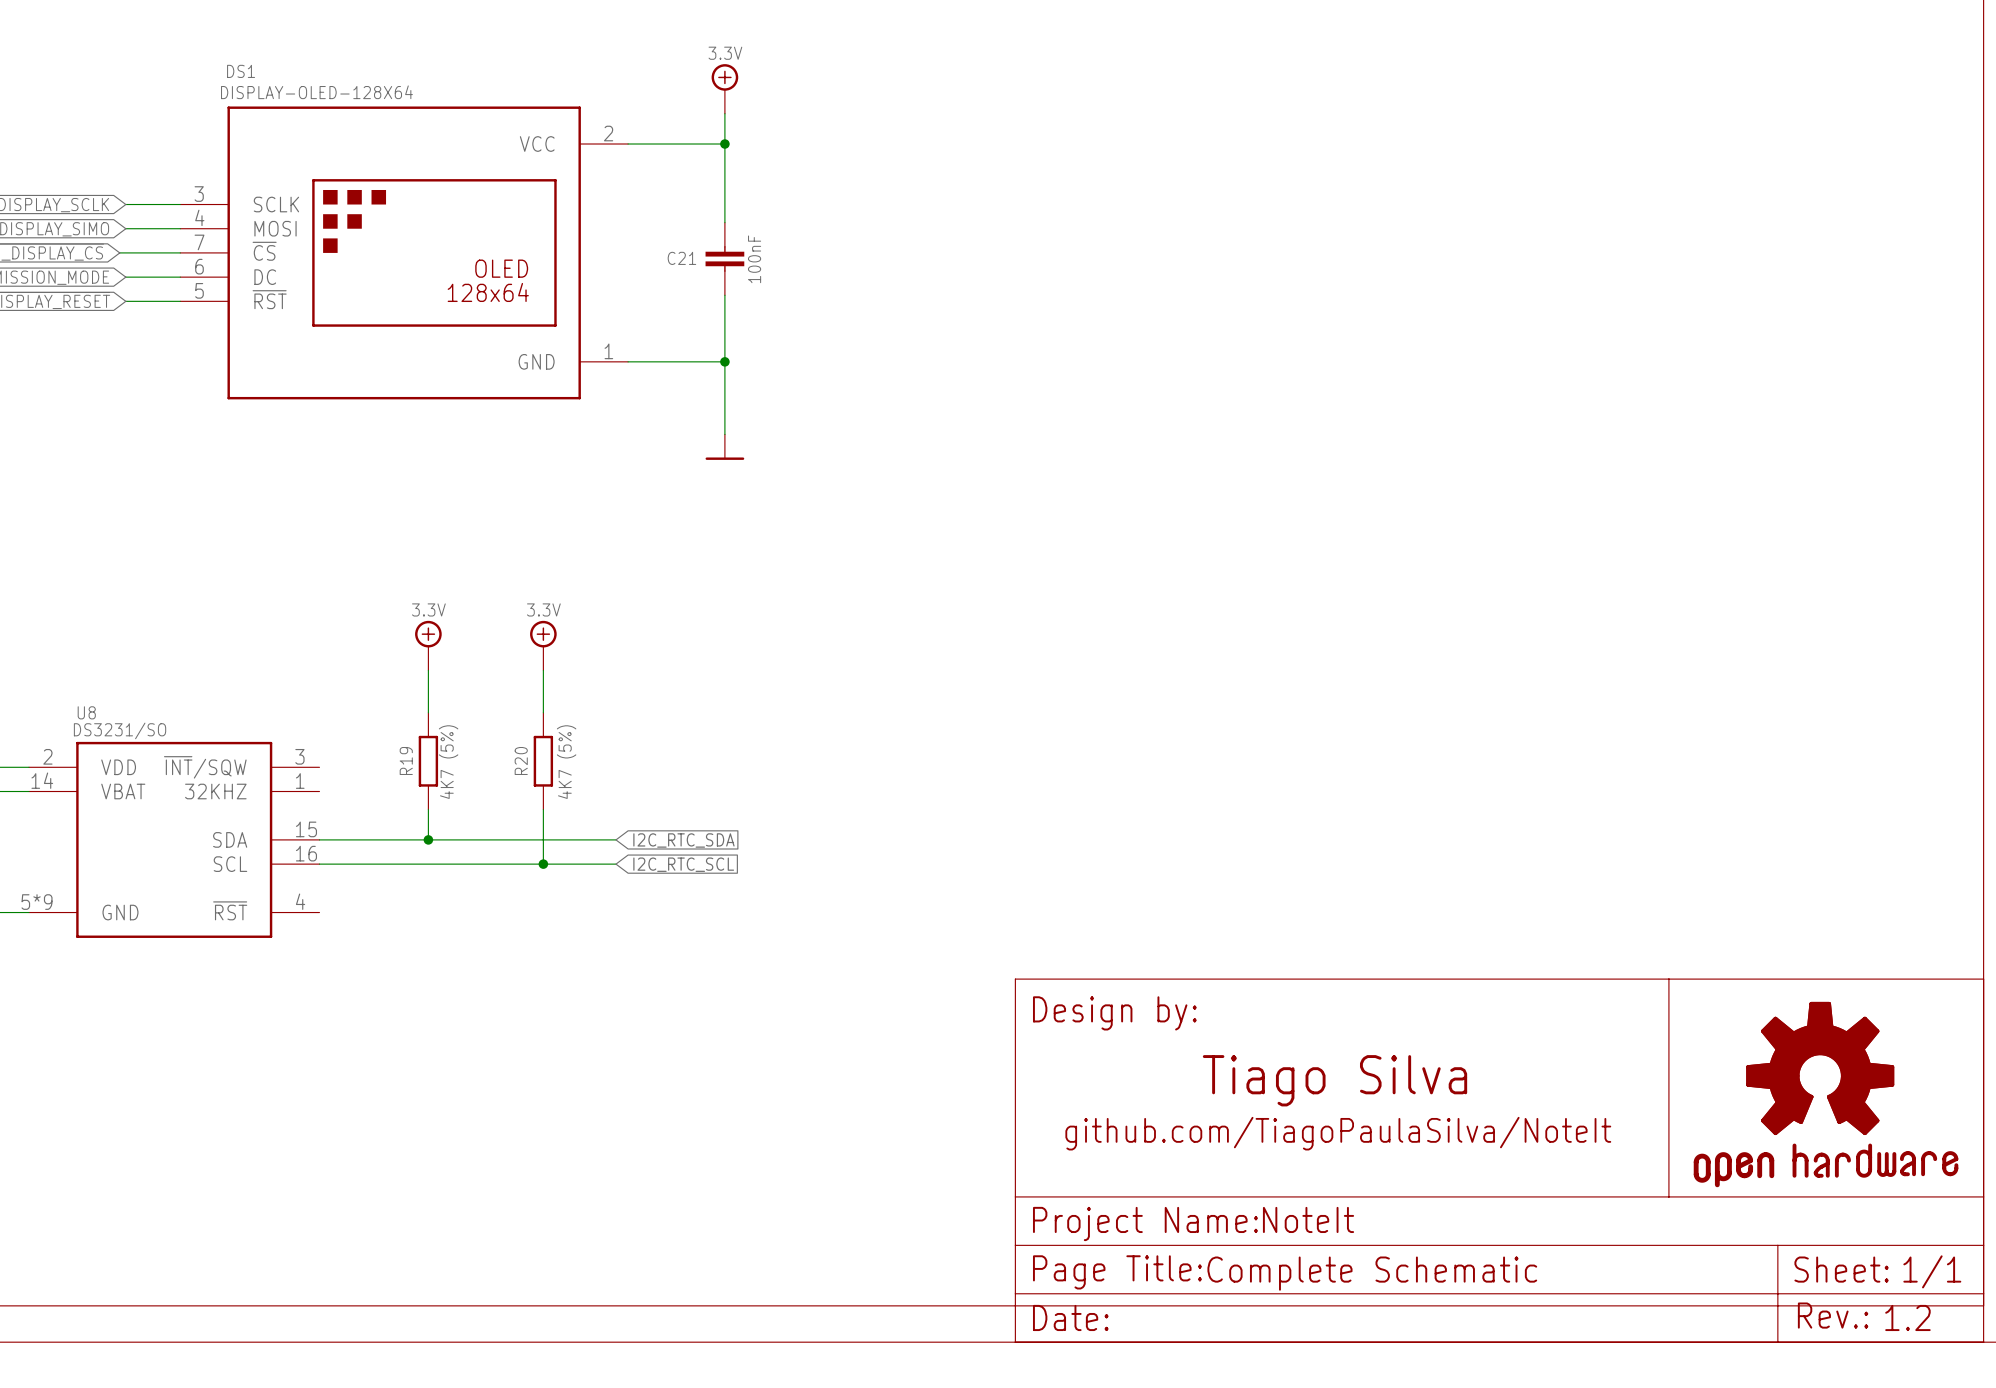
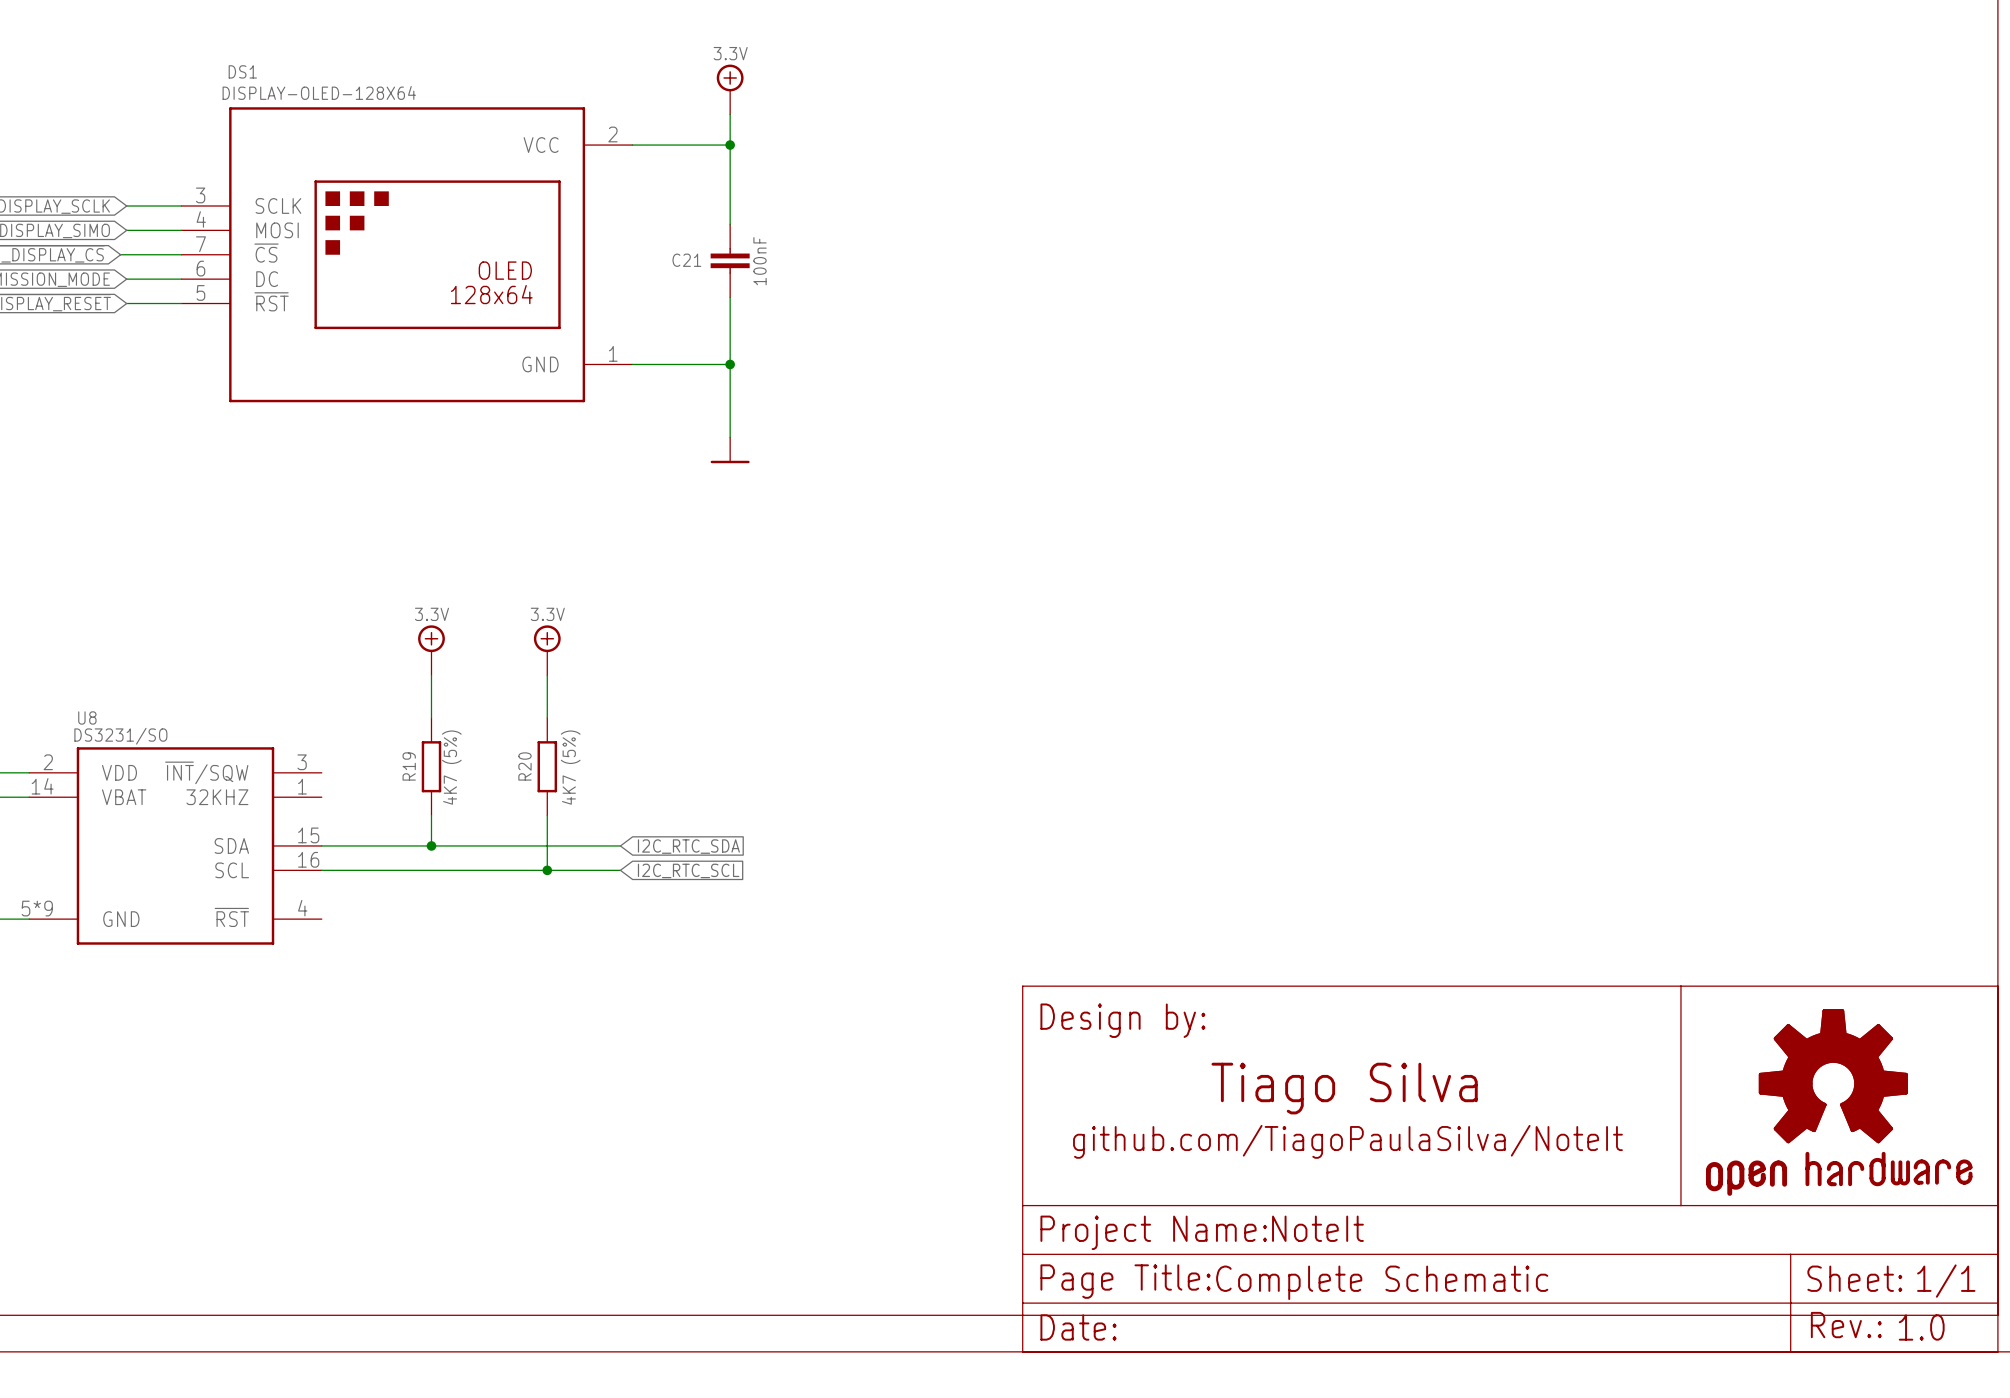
text: 1.2 (1907, 1317) -> 1.0 (1921, 1327)

